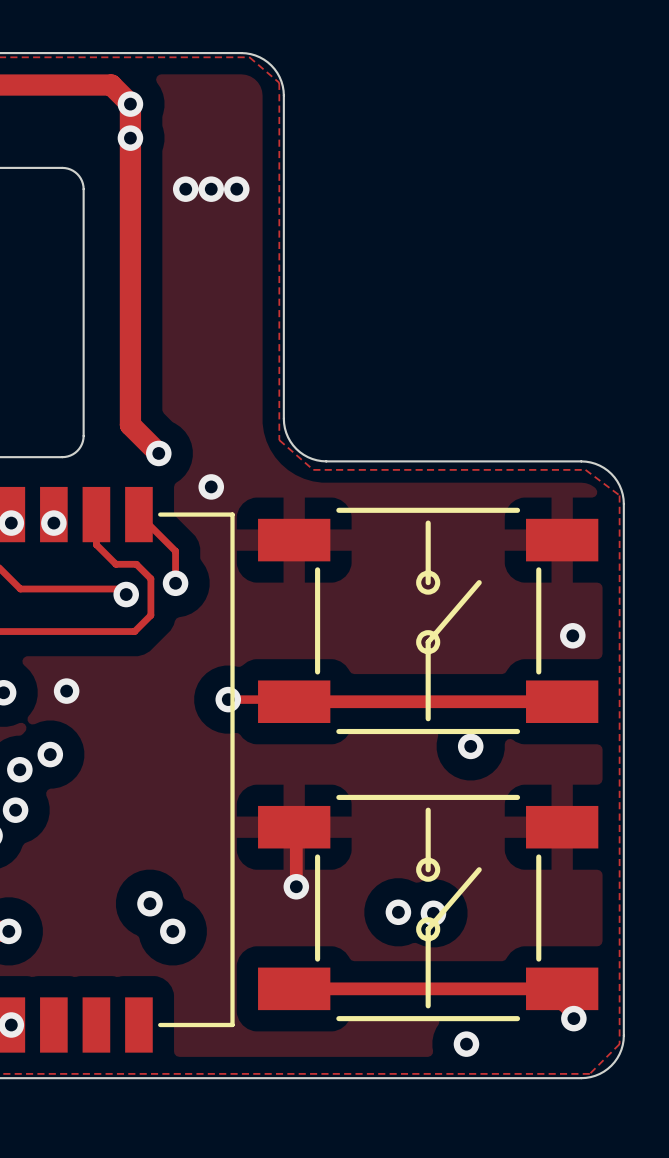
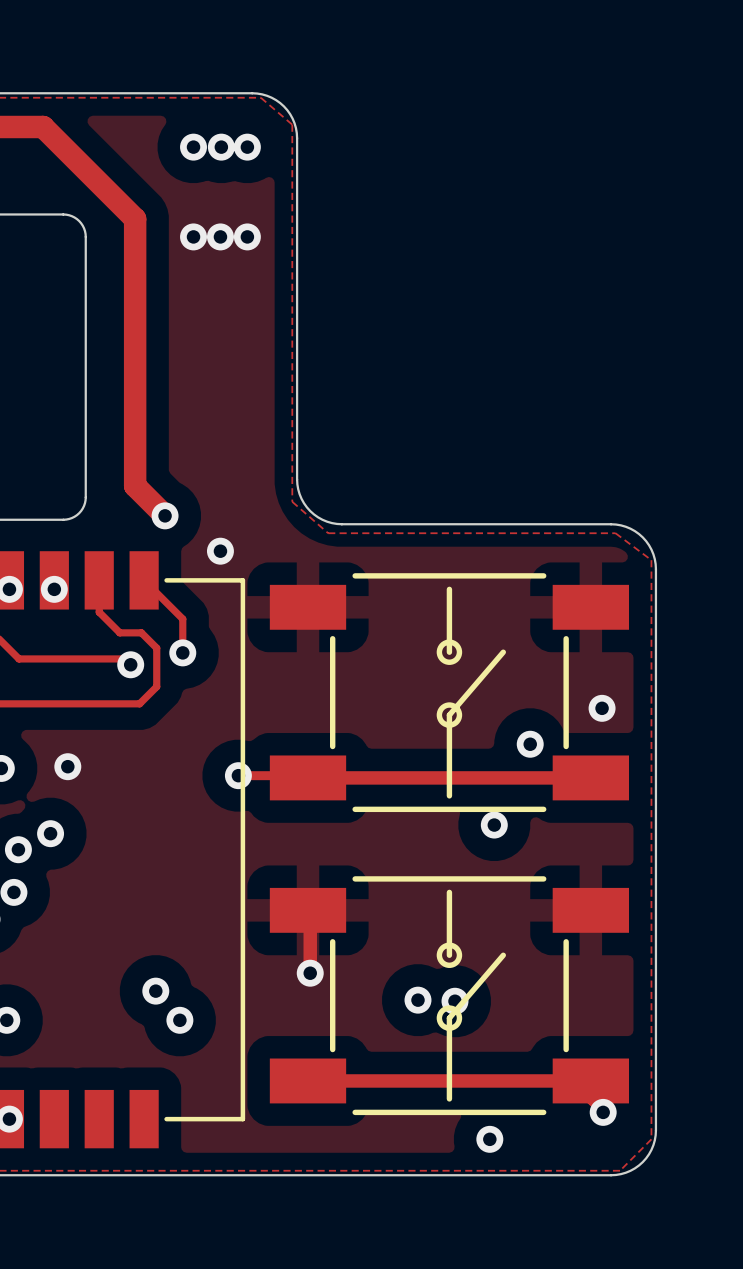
track: (43, 85) (111, 85) (130, 104) (130, 172) -> (43, 127) (135, 218)
via: (130, 104) -> none
via: none -> (193, 147)
via: none -> (221, 147)
via: none -> (247, 147)
via: (130, 138) -> none
via: none -> (530, 744)

